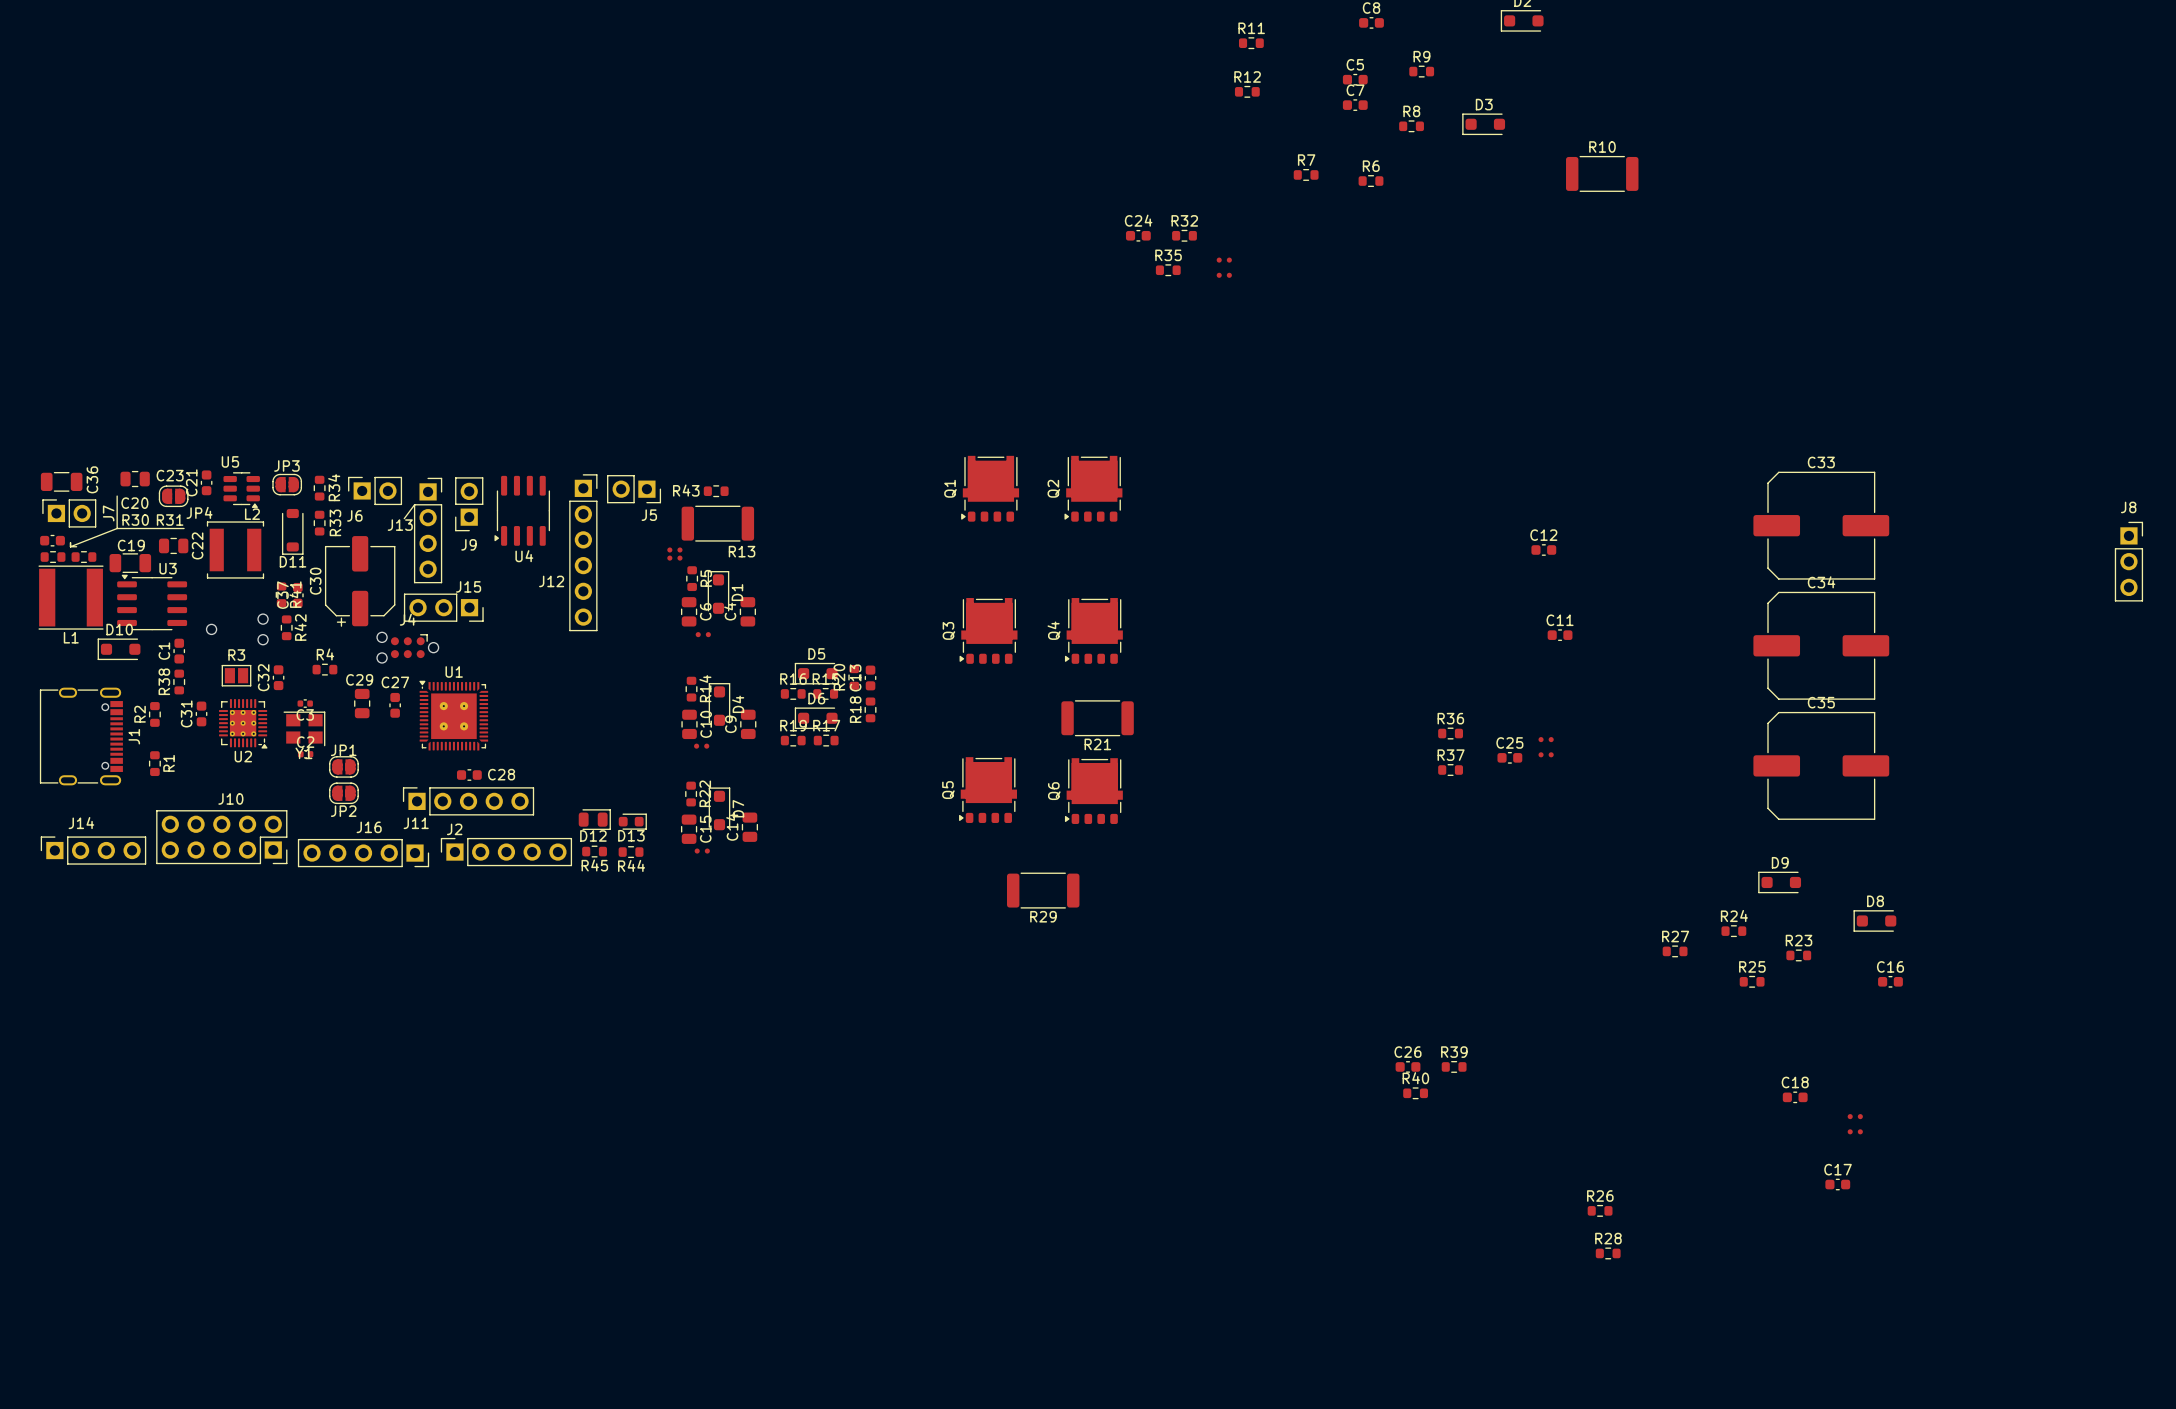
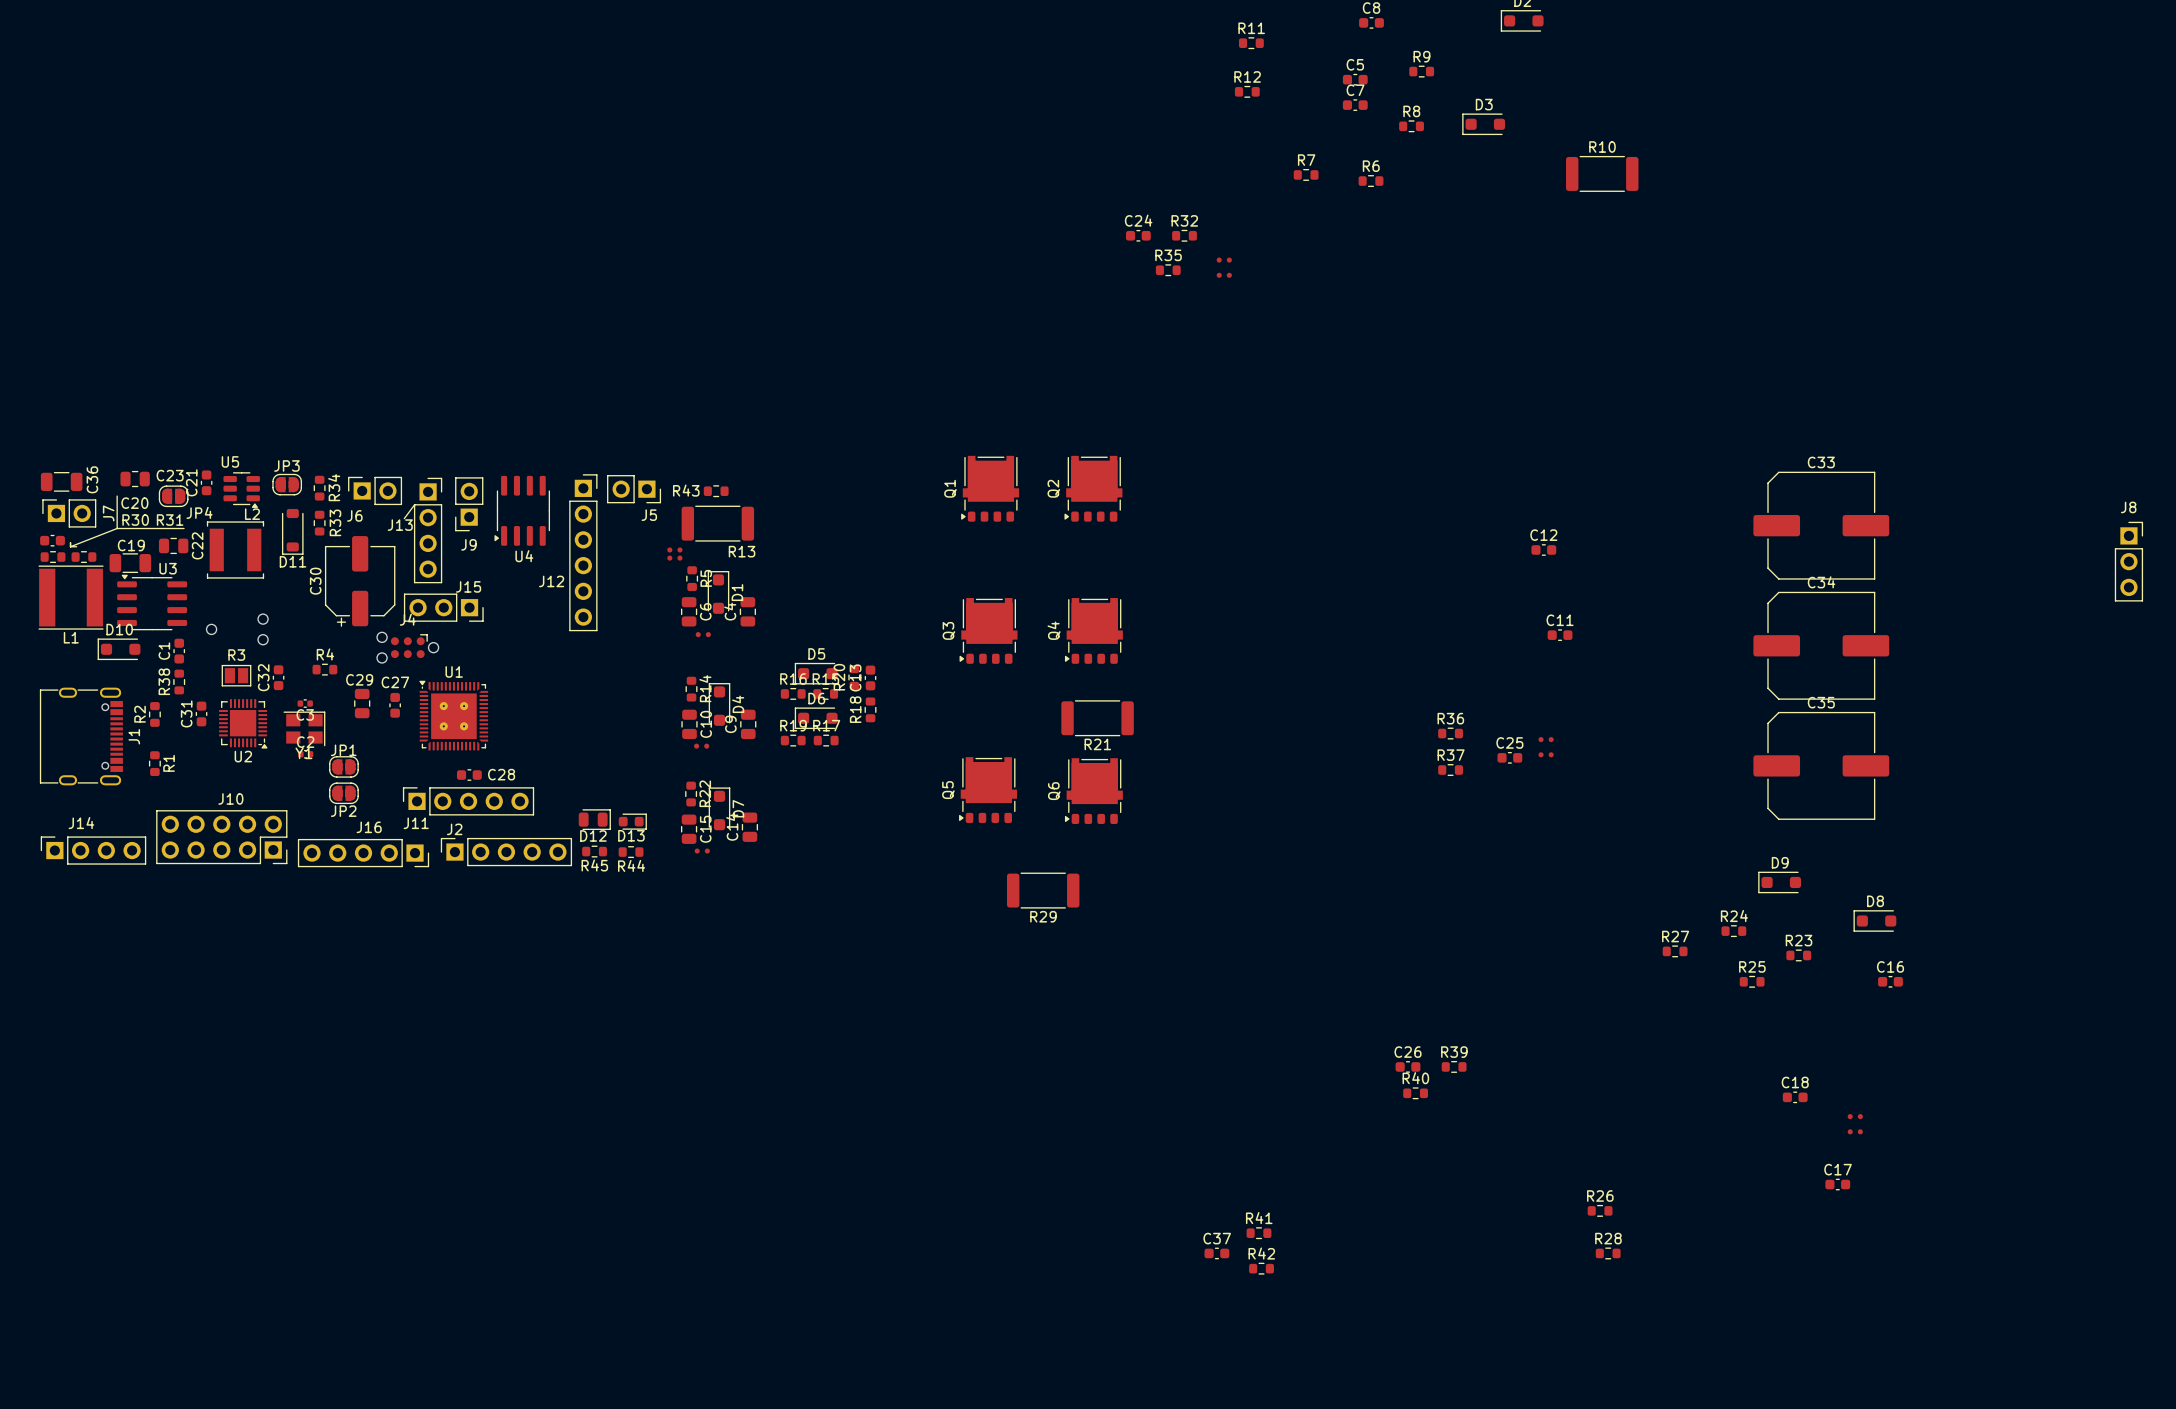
R41 rotation: 0° (281, 594) -> 90° clockwise (1259, 1233)
R41 position: (281, 594) -> (1259, 1233)
R41 name position: R41 (295, 594) -> R41 (1259, 1218)
C37 rotation: 0° (297, 595) -> 90° clockwise (1216, 1253)
C37 position: (297, 595) -> (1216, 1253)
R42 rotation: 0° (286, 627) -> 90° clockwise (1261, 1268)
R42 position: (286, 627) -> (1261, 1268)
R42 name position: R42 (300, 627) -> R42 (1261, 1253)
U2 footprint: [219, 699, 268, 749] -> [219, 699, 268, 749]

